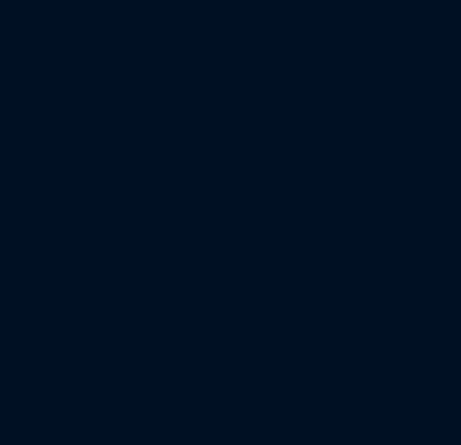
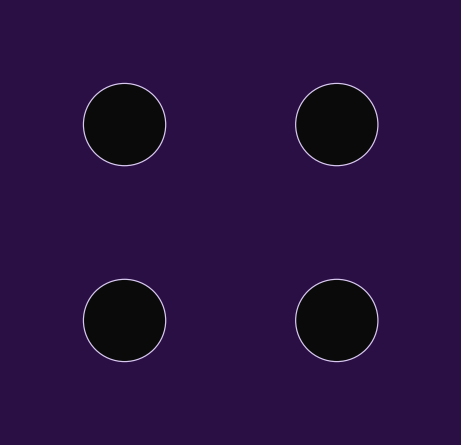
part: none -> (124, 124)
part: none -> (336, 124)
part: none -> (124, 320)
part: none -> (336, 320)

